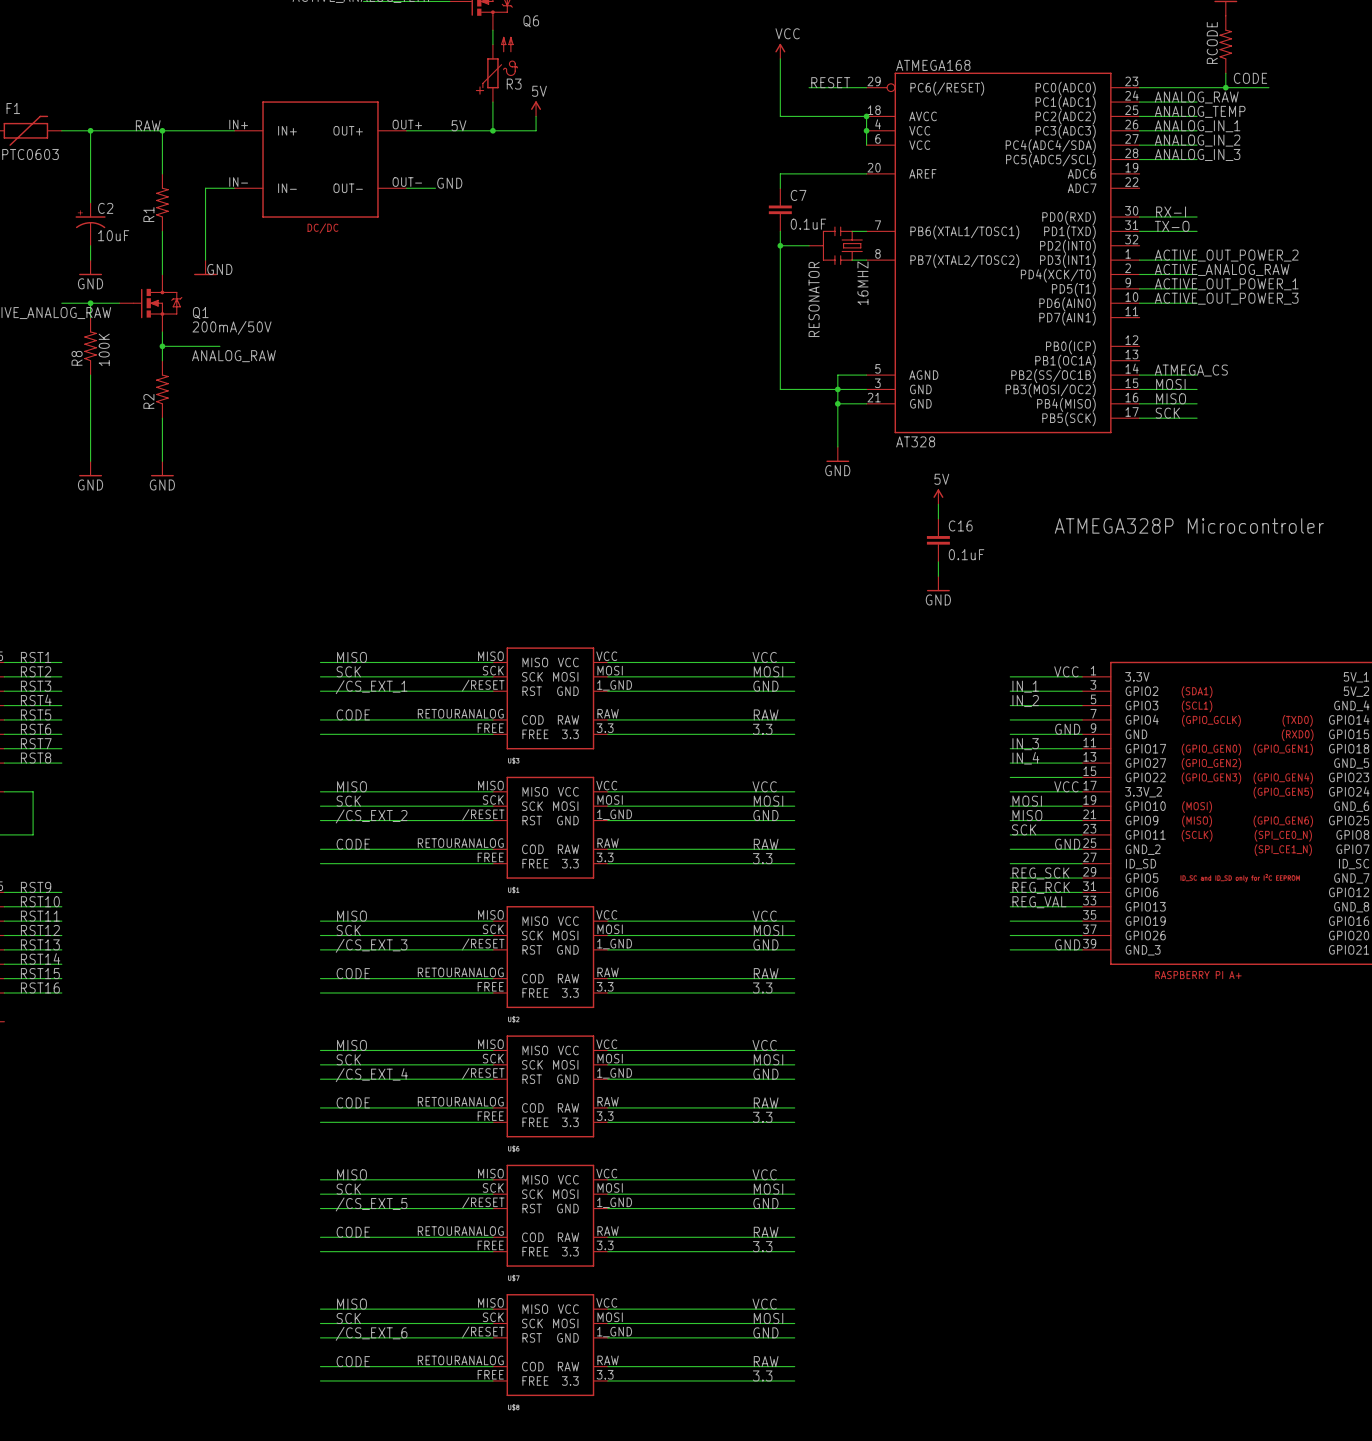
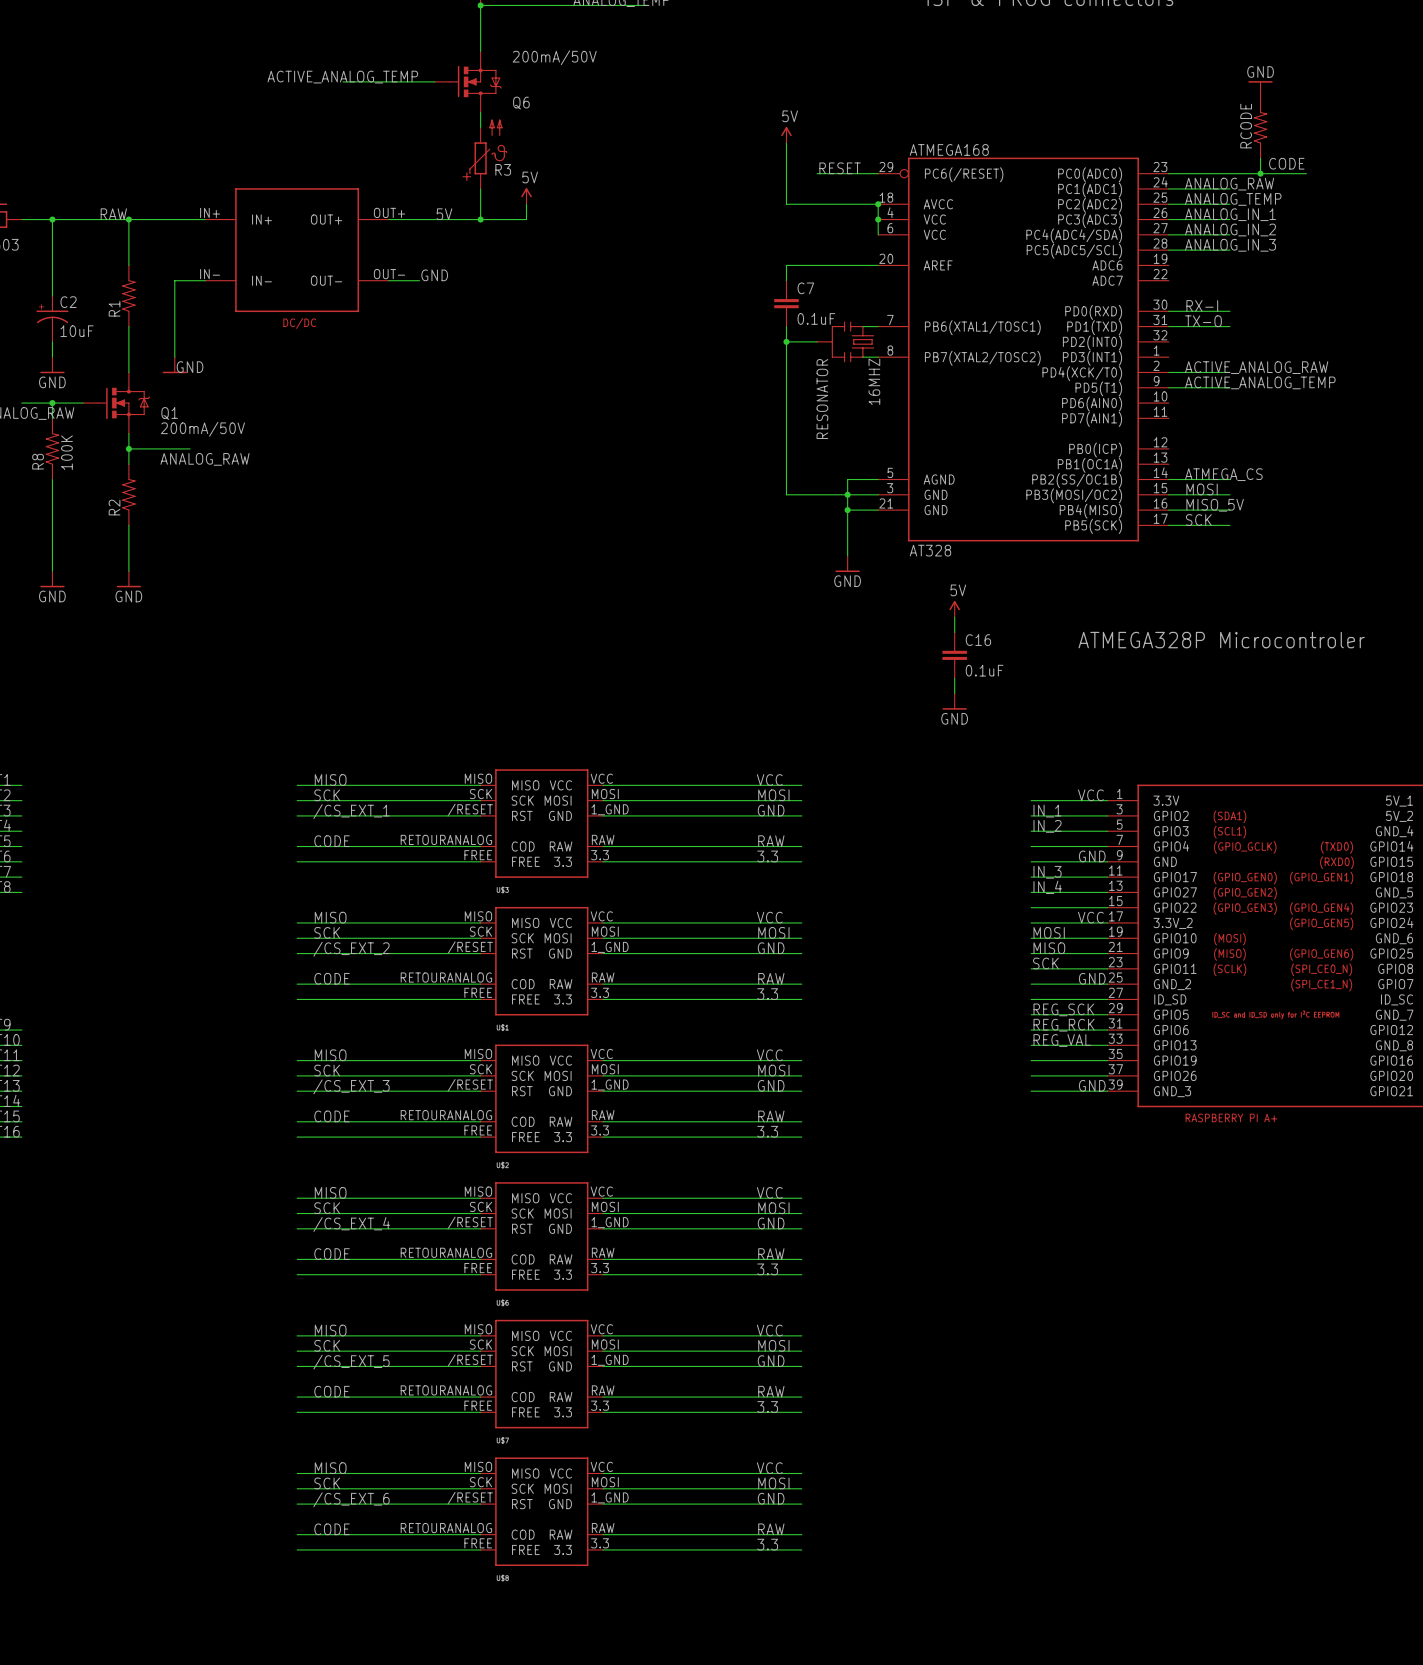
power symbol: VCC (780, 51) -> 5V (786, 135)
label: ACTIVE_OUT_POWER_2 (1226, 255) -> none
wire: (1139, 260) (1197, 260) -> none
label: ACTIVE_OUT_POWER_1 (1226, 284) -> ACTIVE_ANALOG_TEMP (1260, 382)
label: ACTIVE_OUT_POWER_3 (1226, 298) -> none
wire: (1139, 303) (1197, 303) -> none
label: MISO (1171, 398) -> MISO_5V (1215, 505)

